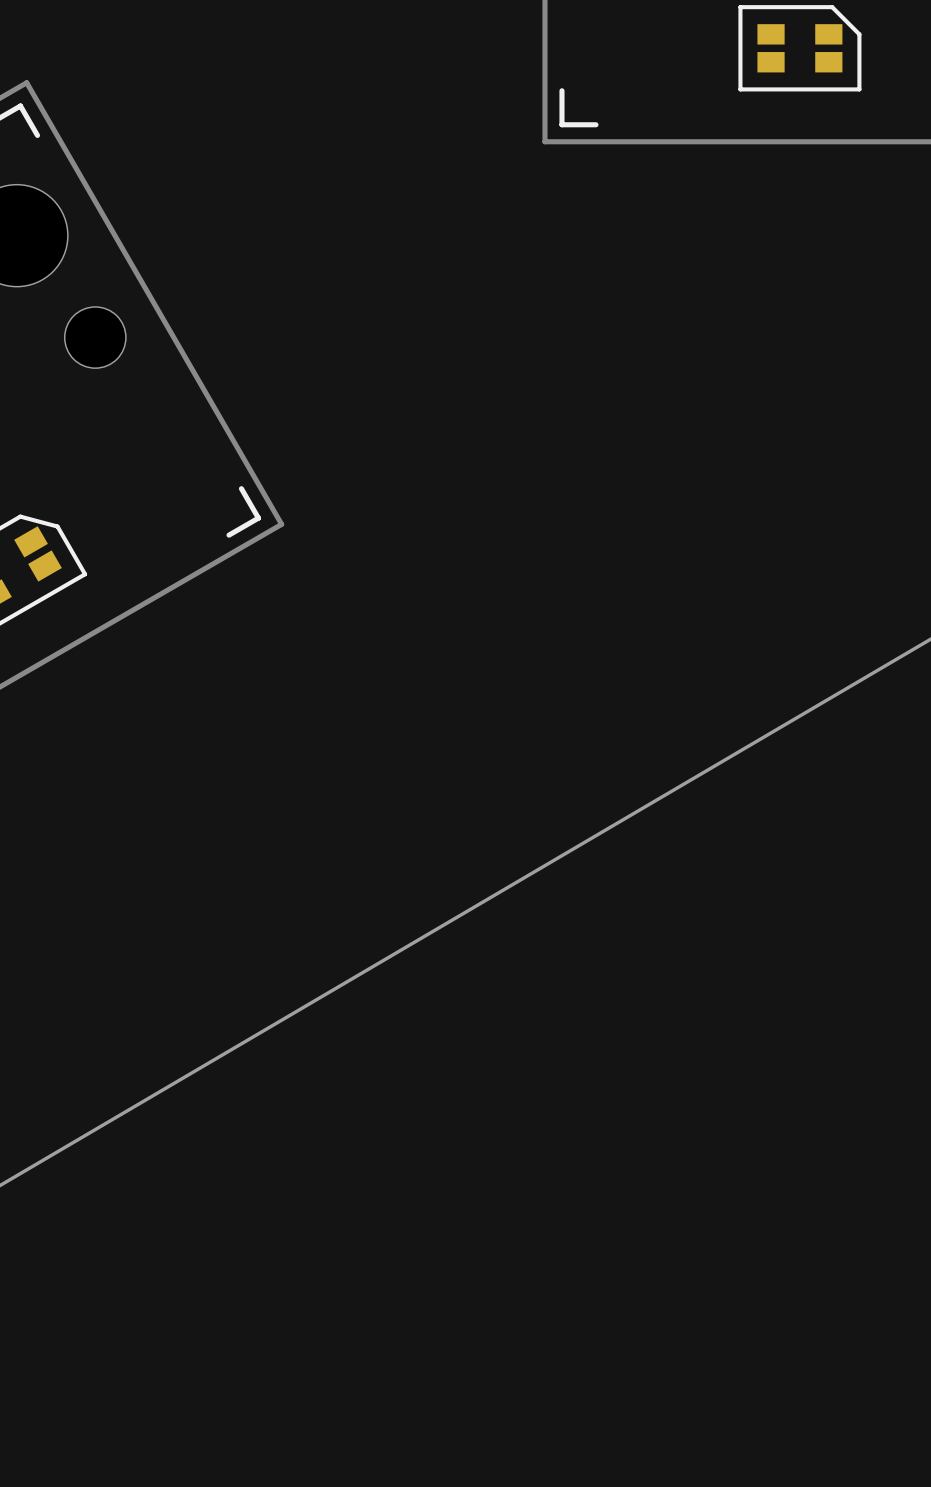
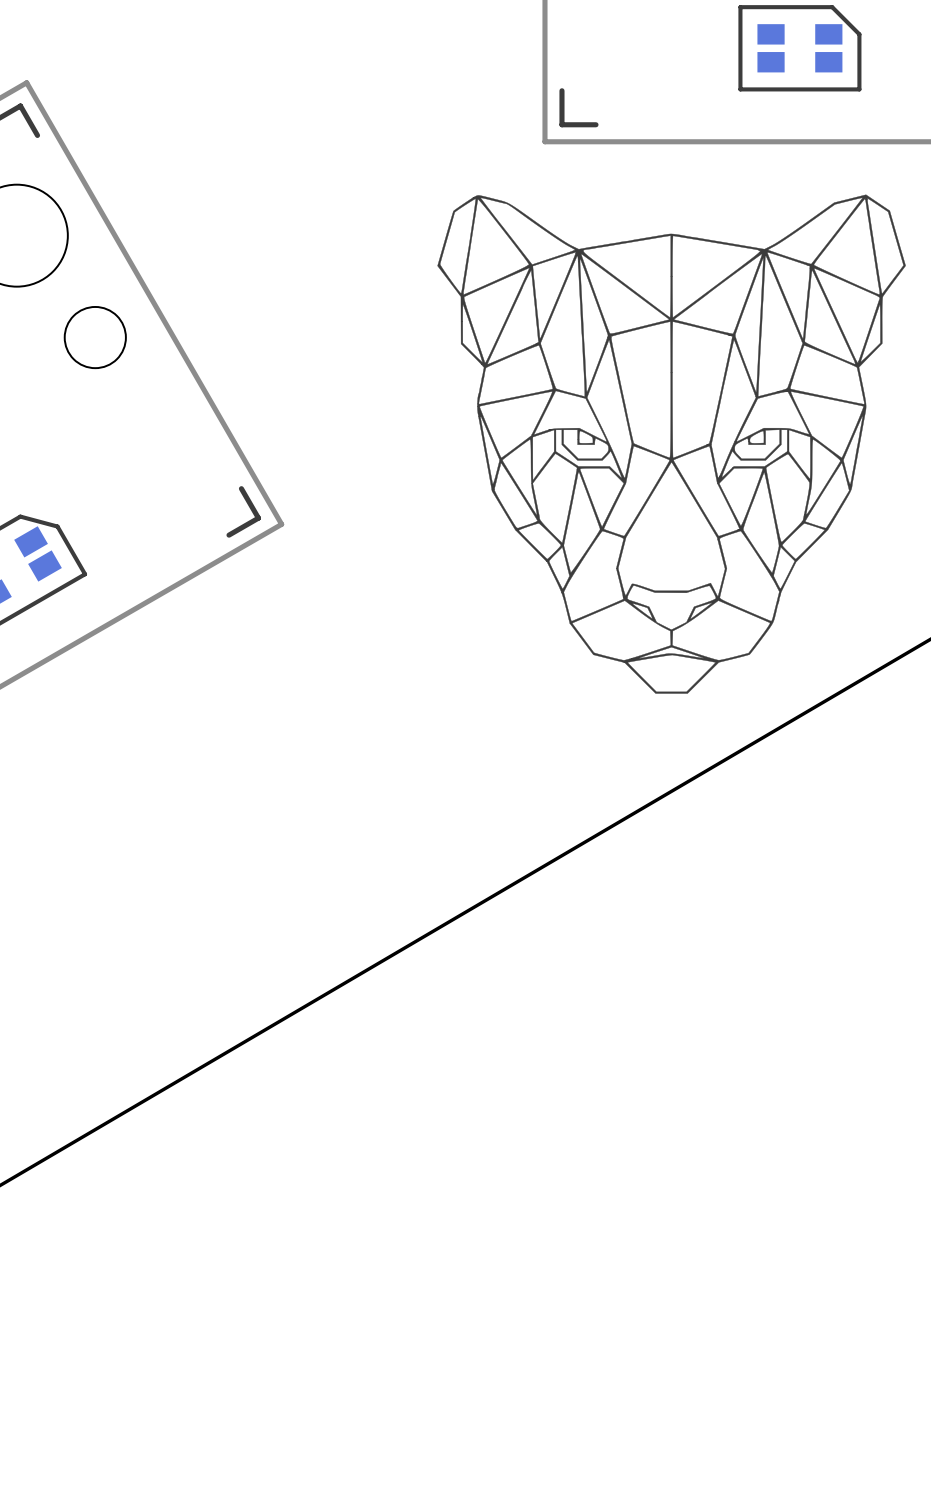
drawing: none -> [437, 194, 906, 694]

